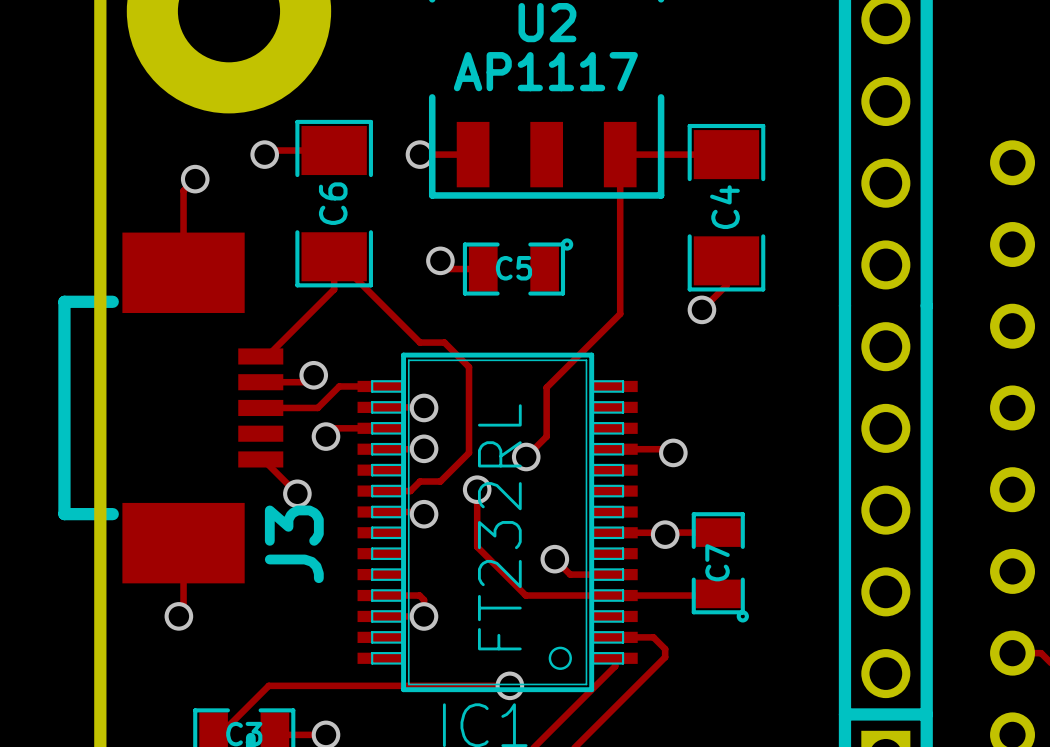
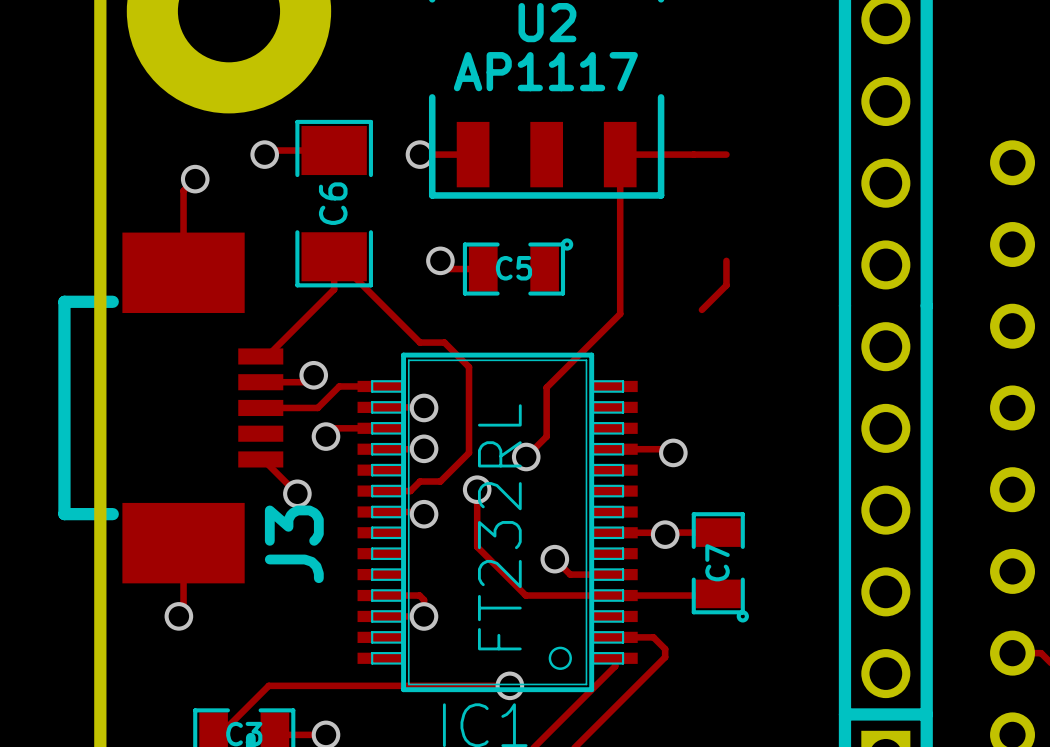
C4: (726, 207) -> none
via: (701, 309) -> none

